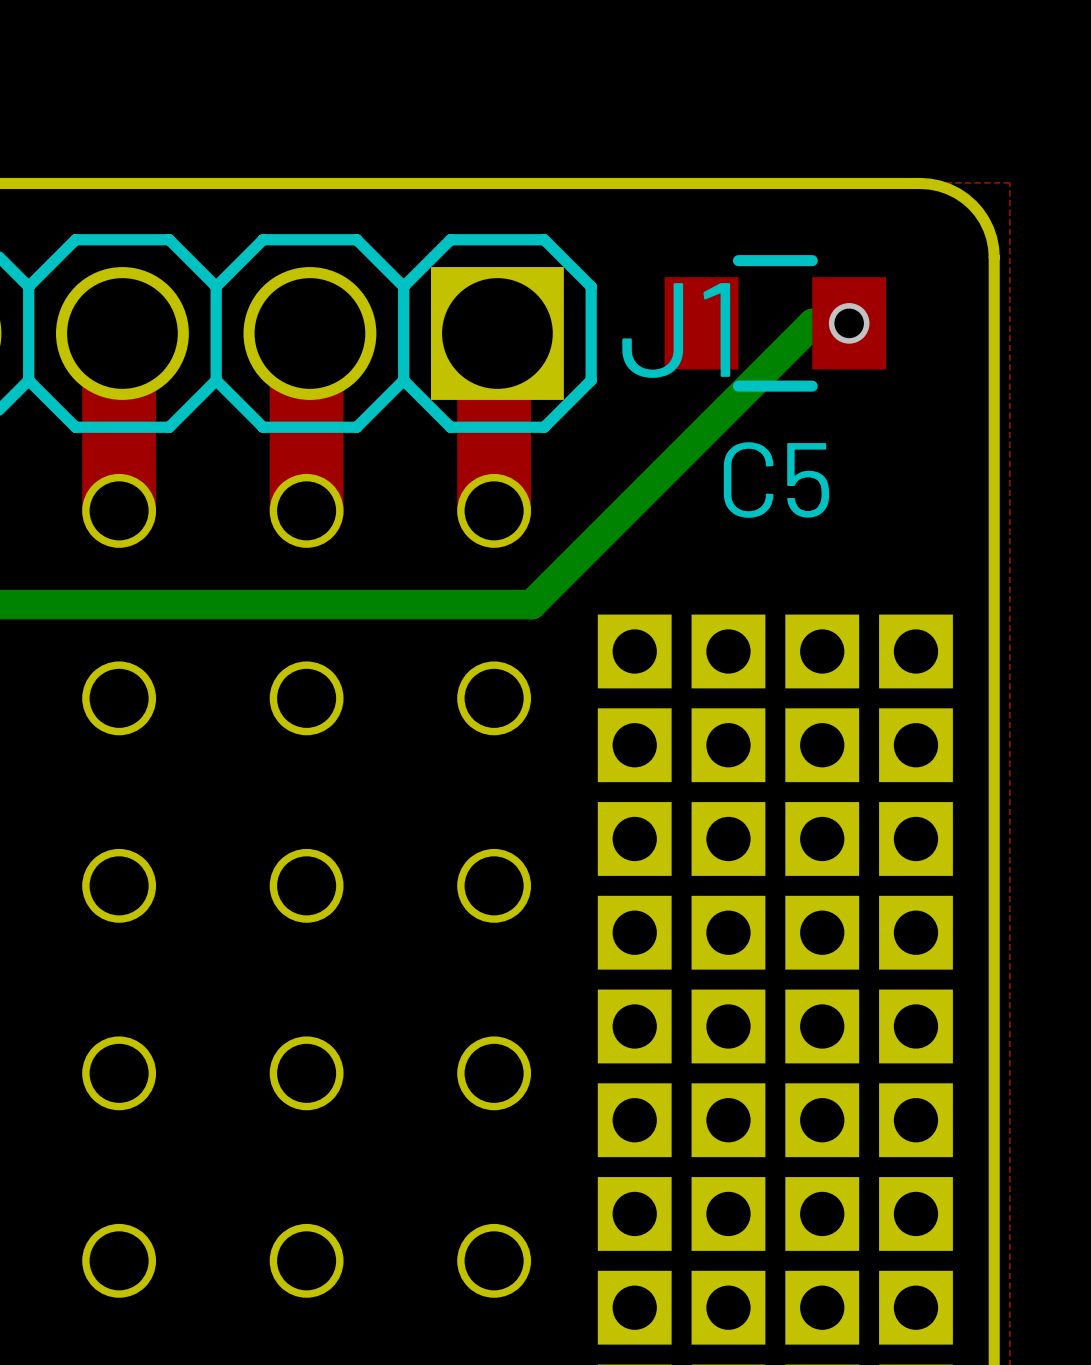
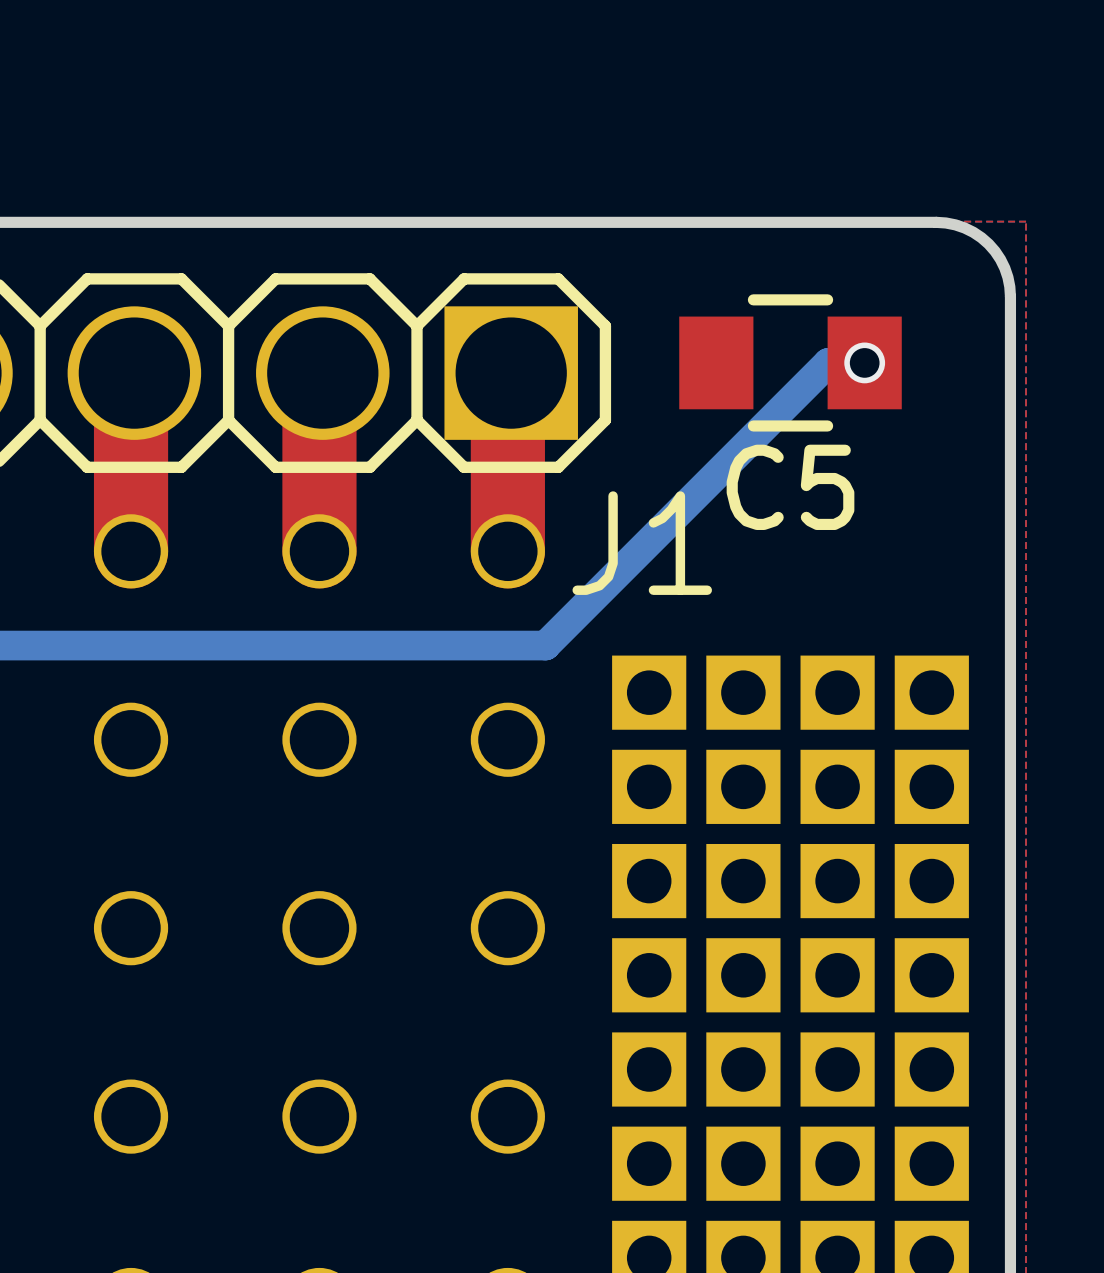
J1 name position: J1 (676, 330) -> J1 (642, 543)
C5 name position: C5 (776, 480) -> C5 (790, 487)

